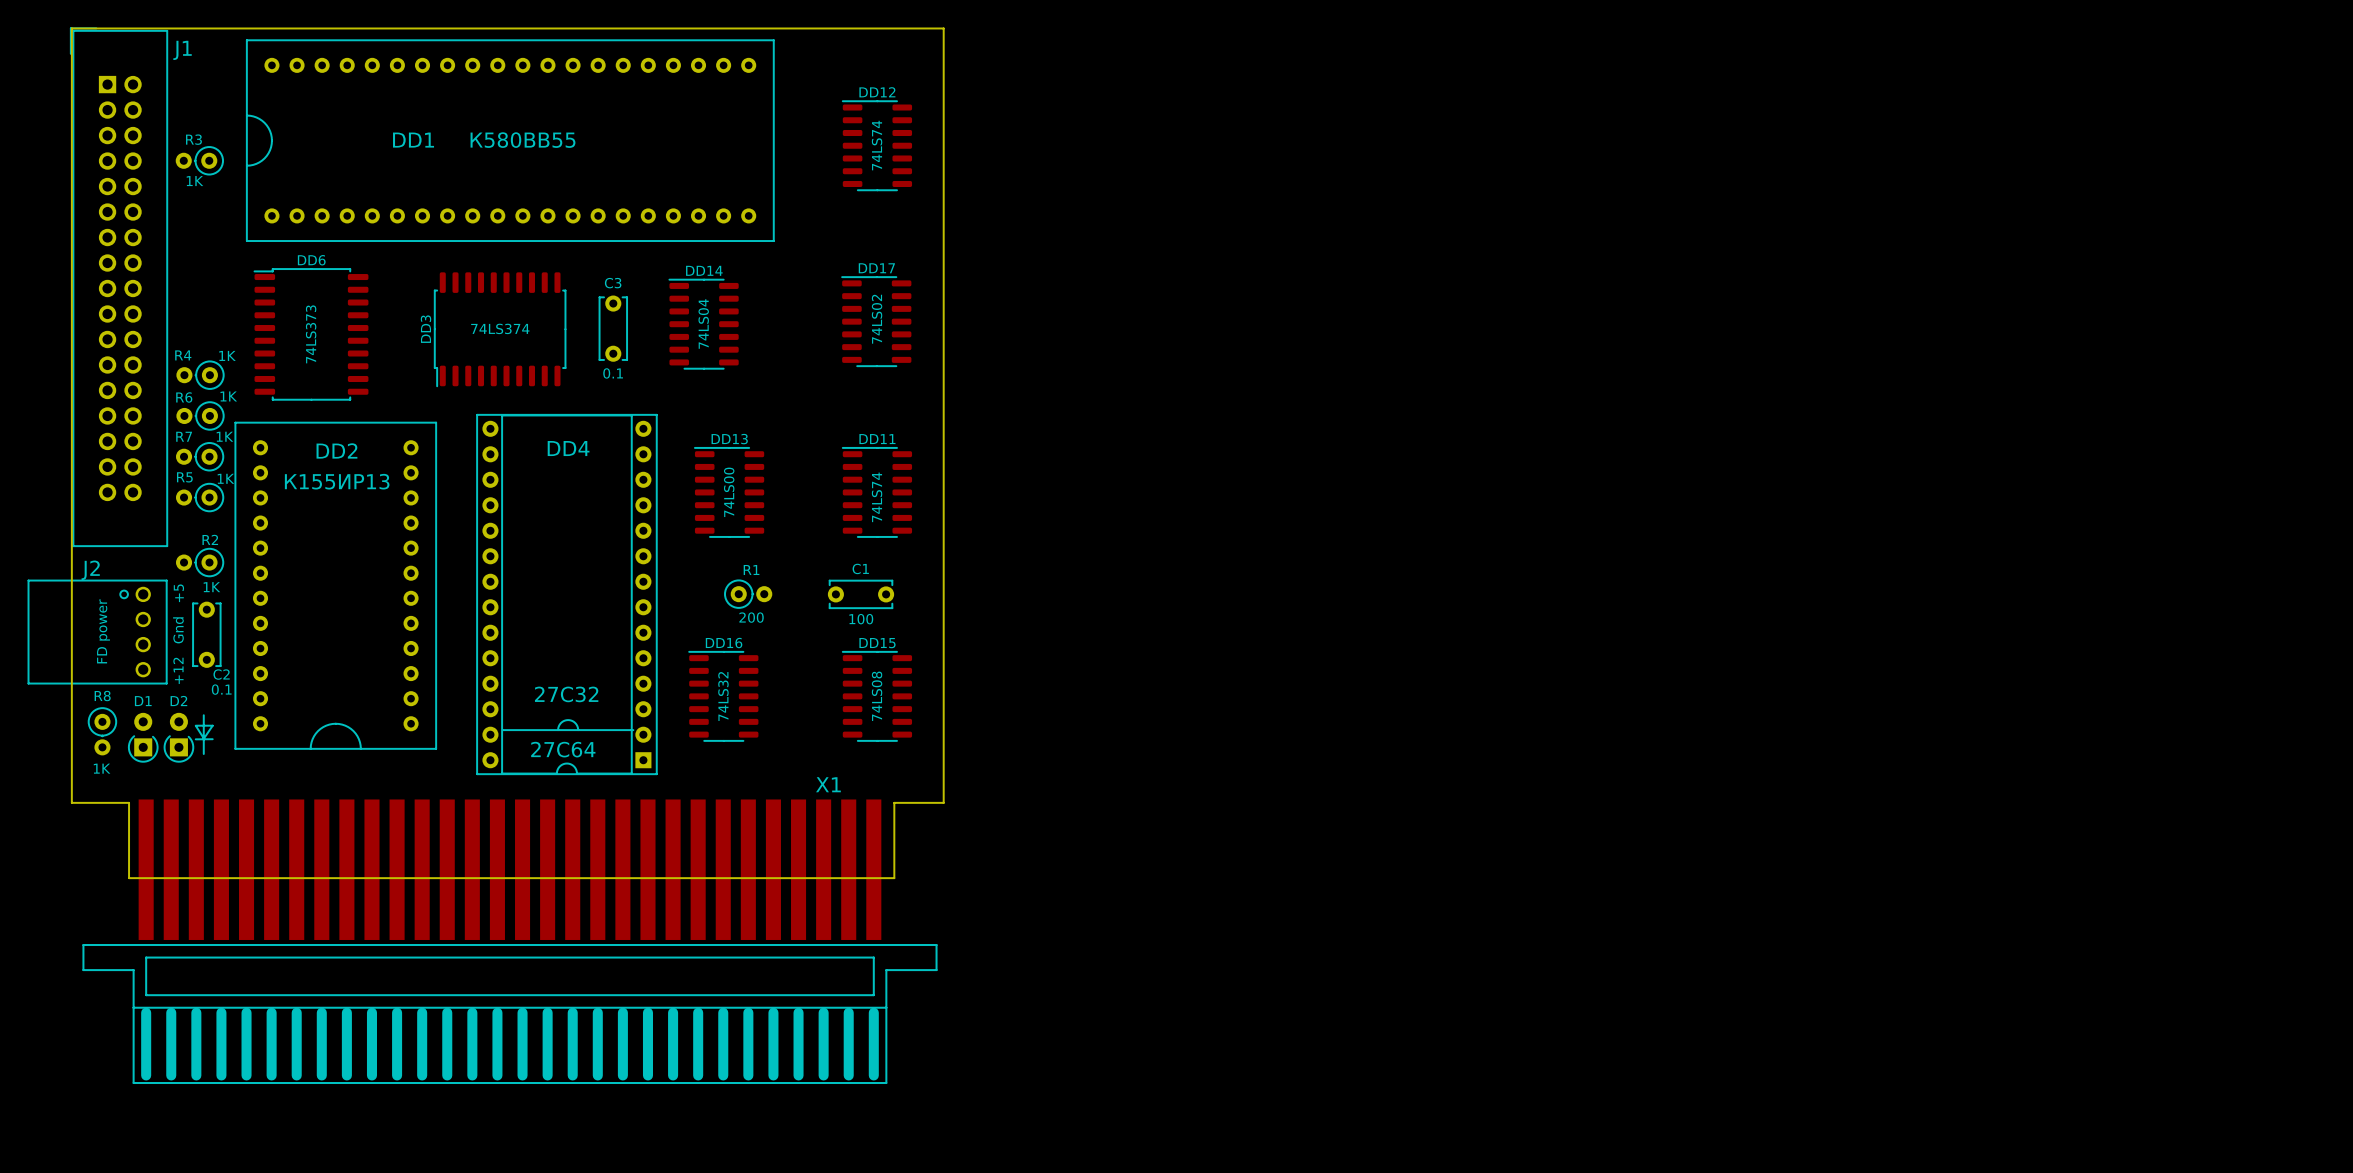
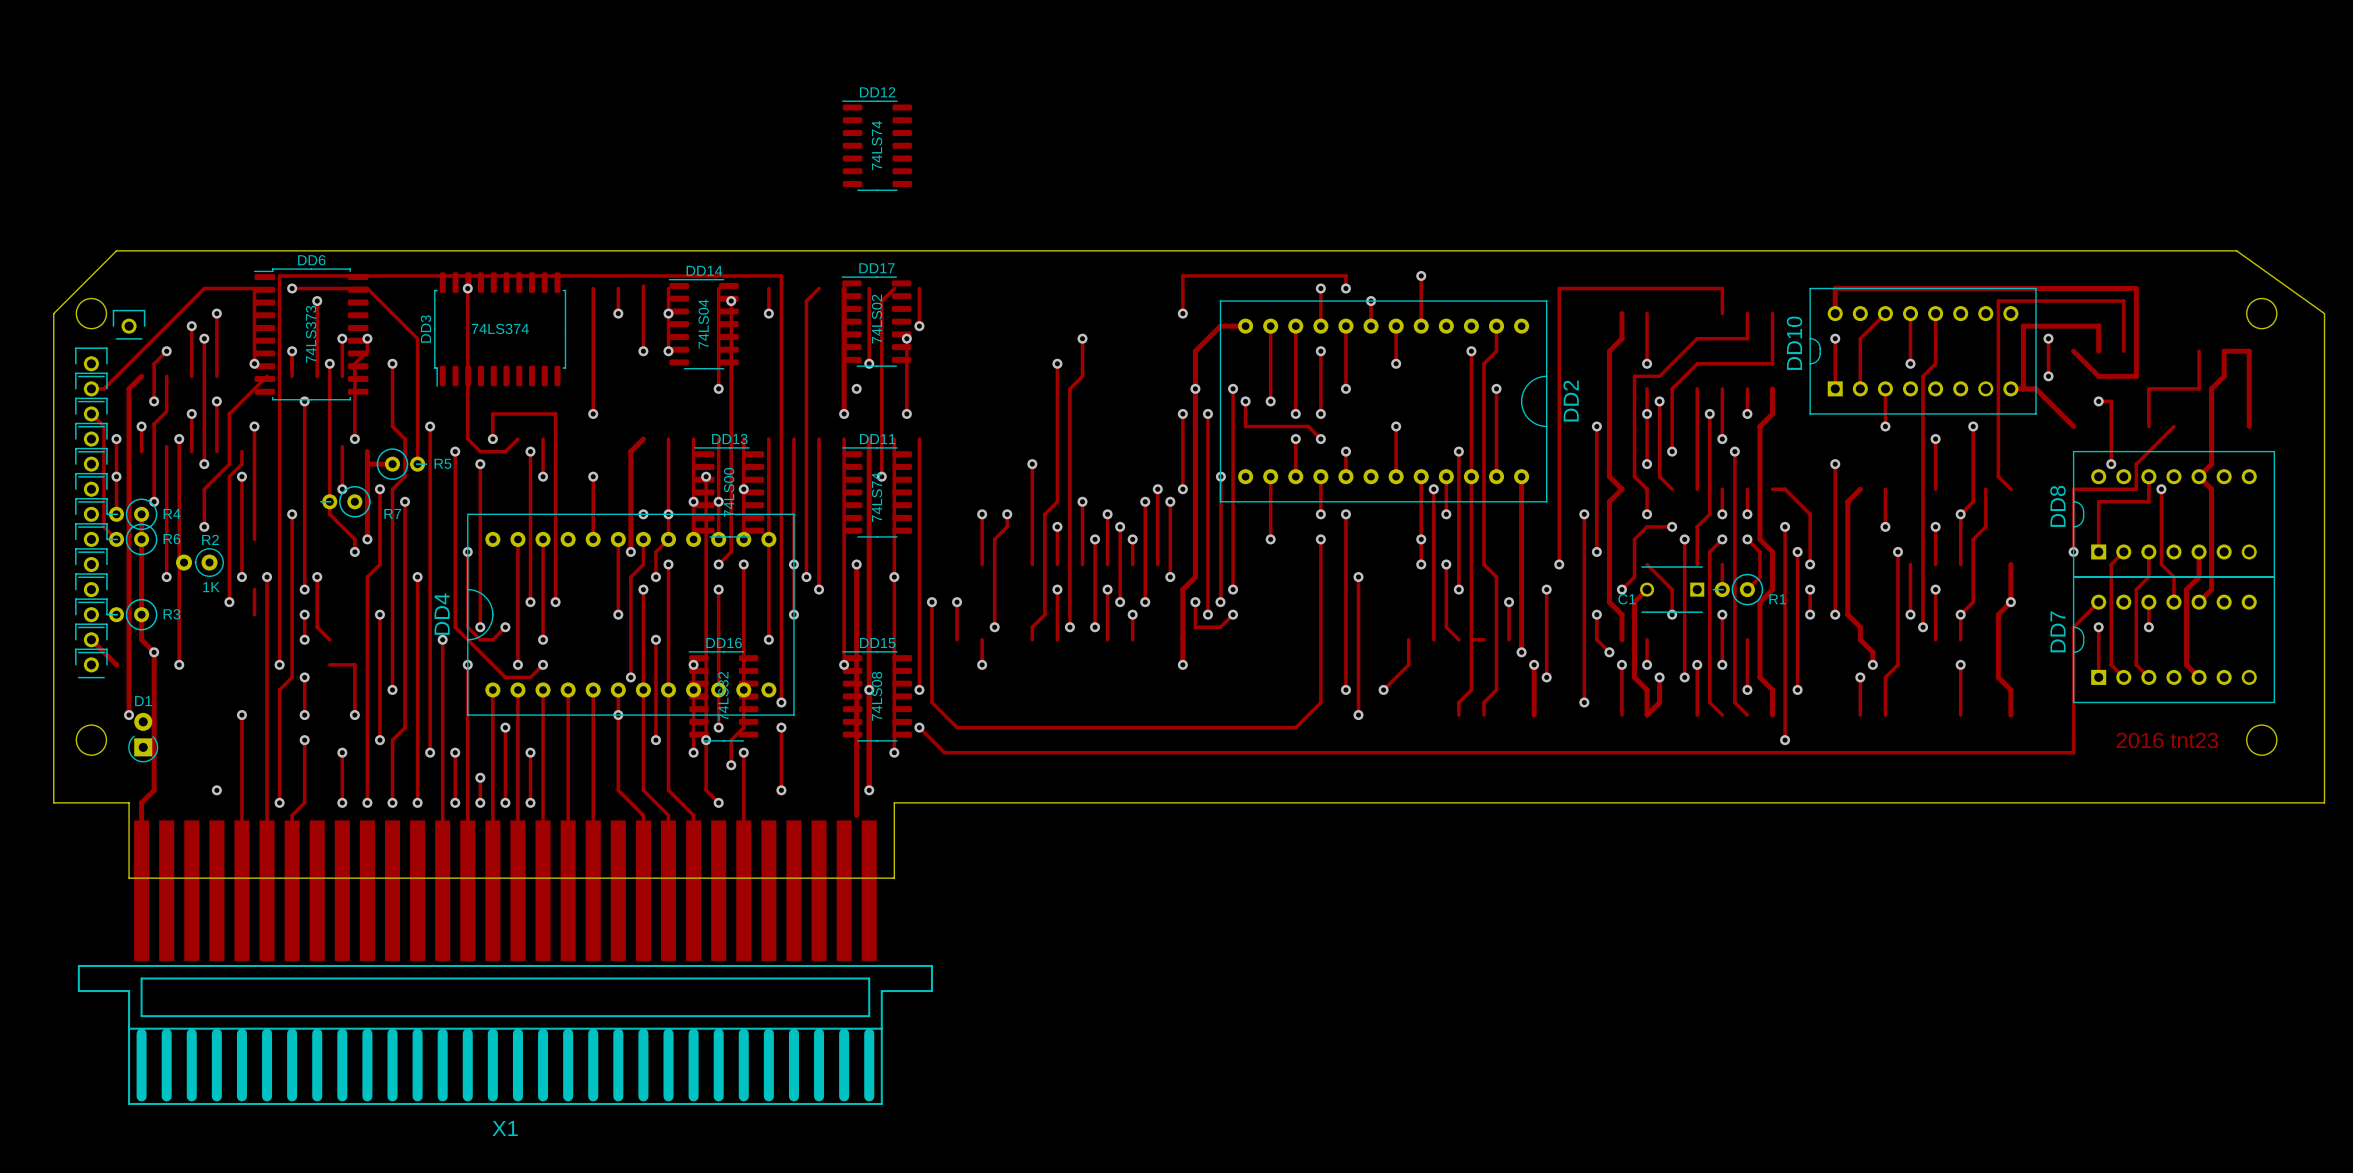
R3 name position: R3 (193, 139) -> R3 (171, 614)
DD1: К580ВВ55 (510, 140) -> none
R3 footprint: [175, 146, 224, 176] -> [106, 598, 158, 631]
R3 value: 1K (194, 181) -> none
track: none -> (1421, 275) (1421, 326)
via: none -> (1421, 275)
track: none -> (643, 285) (643, 351)
J1: (119, 287) -> none
track: none -> (292, 288) (367, 288) (417, 338) (417, 464)
via: none -> (292, 288)
track: none -> (467, 288) (467, 439) (480, 451) (505, 451) (517, 439)
via: none -> (467, 288)
track: none -> (593, 288) (593, 413)
track: none -> (618, 288) (618, 313)
track: none -> (668, 288) (668, 351)
track: none -> (718, 288) (718, 388)
track: none -> (768, 288) (768, 313)
track: none -> (819, 288) (806, 301) (806, 577)
track: none -> (844, 288) (844, 413)
track: none -> (869, 288) (869, 363)
track: none -> (894, 288) (881, 301) (881, 476)
track: none -> (919, 288) (919, 326)
track: none -> (1320, 288) (1320, 326)
via: none -> (1320, 288)
track: none -> (1345, 288) (1345, 275) (1182, 275) (1182, 313)
via: none -> (1345, 288)
round board edge: none -> [75, 298, 107, 330]
round board edge: none -> [2246, 298, 2278, 330]
track: none -> (317, 301) (317, 376)
via: none -> (317, 301)
track: none -> (731, 301) (731, 551) (718, 564)
via: none -> (731, 301)
track: none -> (1371, 301) (1371, 326)
via: none -> (1371, 301)
track: none -> (216, 313) (216, 376)
via: none -> (216, 313)
via: none -> (618, 313)
via: none -> (668, 313)
via: none -> (768, 313)
via: none -> (1182, 313)
track: none -> (1621, 313) (1621, 338) (1609, 351) (1609, 476) (1621, 489) (1609, 501) (1609, 602) (1621, 614) (1621, 639)
track: none -> (1647, 313) (1647, 363)
track: none -> (1722, 313) (1722, 288) (1559, 288) (1559, 564)
track: none -> (1747, 313) (1747, 338) (1697, 338) (1659, 376) (1634, 376) (1634, 476) (1647, 489) (1647, 514)
track: none -> (1772, 313) (1772, 363) (1697, 363) (1672, 388) (1672, 451)
track: none -> (1835, 313) (1835, 288) (2136, 288) (2136, 376) (2098, 376) (2073, 351)
track: none -> (1885, 313) (1860, 338) (1860, 388)
track: none -> (1910, 313) (1910, 363)
track: none -> (1935, 313) (1935, 363) (1923, 376) (1923, 627)
part: none -> (129, 324)
track: none -> (191, 326) (191, 376)
via: none -> (191, 326)
via: none -> (919, 326)
track: none -> (1245, 326) (1220, 326) (1195, 351) (1195, 577) (1182, 589) (1182, 664)
track: none -> (1270, 326) (1270, 401)
track: none -> (1295, 326) (1295, 413)
track: none -> (1345, 326) (1345, 388)
track: none -> (1396, 326) (1396, 363)
track: none -> (1496, 326) (1496, 351) (1483, 363) (1483, 564) (1496, 577) (1496, 689) (1483, 702) (1483, 715)
C3: 0.1 (613, 328) -> none
track: none -> (204, 338) (204, 464)
via: none -> (204, 338)
track: none -> (342, 338) (342, 376)
via: none -> (342, 338)
track: none -> (367, 338) (367, 351) (354, 363) (354, 439)
via: none -> (367, 338)
track: none -> (906, 338) (906, 413)
via: none -> (906, 338)
track: none -> (1082, 338) (1082, 376) (1069, 388) (1069, 627)
via: none -> (1082, 338)
track: none -> (1835, 338) (1835, 388)
via: none -> (1835, 338)
track: none -> (2048, 338) (2048, 376)
via: none -> (2048, 338)
track: none -> (166, 351) (154, 363) (154, 401)
via: none -> (166, 351)
track: none -> (292, 351) (292, 376)
via: none -> (292, 351)
via: none -> (643, 351)
via: none -> (668, 351)
track: none -> (1320, 351) (1320, 413)
via: none -> (1320, 351)
track: none -> (1471, 351) (1471, 689) (1458, 702) (1458, 715)
via: none -> (1471, 351)
DD10: none -> (1923, 351)
track: none -> (2098, 351) (2098, 326) (2023, 326) (2023, 388)
track: none -> (2123, 351) (2123, 301) (1998, 301) (1998, 476) (2010, 489)
track: none -> (2199, 351) (2199, 388) (2148, 388) (2148, 426)
R4 name position: R4 (183, 355) -> R4 (172, 513)
R4 value: 1K (227, 355) -> none
R4 footprint: [176, 360, 225, 390] -> [106, 498, 158, 531]
part: none -> (91, 362)
track: none -> (254, 363) (254, 288) (204, 288) (103, 388) (91, 388)
via: none -> (254, 363)
track: none -> (329, 363) (329, 514) (354, 539) (354, 551)
via: none -> (329, 363)
track: none -> (392, 363) (392, 426) (405, 439) (405, 476) (392, 489) (392, 689)
via: none -> (392, 363)
via: none -> (869, 363)
track: none -> (1057, 363) (1057, 501) (1044, 514) (1044, 614) (1032, 627) (1032, 639)
via: none -> (1057, 363)
via: none -> (1396, 363)
via: none -> (1647, 363)
via: none -> (1910, 363)
track: none -> (141, 376) (129, 388) (129, 715)
track: none -> (166, 376) (166, 411) (154, 423) (154, 501)
track: none -> (267, 376) (229, 413) (229, 464) (204, 489) (204, 526)
via: none -> (2048, 376)
part: none -> (91, 387)
via: none -> (718, 388)
via: none -> (856, 388)
via: none -> (1195, 388)
track: none -> (1233, 388) (1233, 589)
via: none -> (1233, 388)
via: none -> (1345, 388)
track: none -> (1496, 388) (1496, 476)
via: none -> (1496, 388)
track: none -> (1647, 388) (1647, 464)
track: none -> (1697, 388) (1697, 489)
track: none -> (1722, 388) (1722, 439)
track: none -> (1747, 388) (1747, 413)
track: none -> (1772, 388) (1772, 413) (1759, 426) (1759, 539) (1772, 551) (1772, 589) (1759, 602) (1759, 677) (1772, 689) (1772, 715)
track: none -> (1885, 388) (1885, 426)
track: none -> (2010, 388) (2035, 388) (2073, 426)
R6 value: 1K (228, 396) -> none
R6 name position: R6 (184, 397) -> R6 (171, 539)
via: none -> (154, 401)
R6 footprint: [176, 401, 225, 431] -> [106, 523, 158, 556]
track: none -> (216, 401) (216, 451)
via: none -> (216, 401)
track: none -> (304, 401) (304, 589)
via: none -> (304, 401)
track: none -> (1245, 401) (1245, 426) (1308, 426) (1320, 439)
via: none -> (1245, 401)
via: none -> (1270, 401)
track: none -> (1659, 401) (1659, 476) (1672, 489)
via: none -> (1659, 401)
track: none -> (2098, 401) (2111, 401) (2111, 464)
via: none -> (2098, 401)
part: none -> (91, 412)
track: none -> (91, 413) (103, 426) (103, 526) (116, 539)
track: none -> (191, 413) (191, 451)
via: none -> (191, 413)
via: none -> (593, 413)
via: none -> (844, 413)
via: none -> (906, 413)
track: none -> (1182, 413) (1182, 489)
via: none -> (1182, 413)
track: none -> (1207, 413) (1207, 614)
via: none -> (1207, 413)
via: none -> (1295, 413)
via: none -> (1320, 413)
via: none -> (1647, 413)
track: none -> (1709, 413) (1709, 514) (1697, 526) (1697, 564)
via: none -> (1709, 413)
via: none -> (1747, 413)
DD4 footprint: [476, 414, 658, 775] -> [467, 514, 795, 716]
track: none -> (141, 426) (141, 451)
via: none -> (141, 426)
track: none -> (254, 426) (254, 539)
via: none -> (254, 426)
track: none -> (430, 426) (430, 752)
via: none -> (430, 426)
track: none -> (1396, 426) (1396, 476)
via: none -> (1396, 426)
track: none -> (1596, 426) (1596, 551)
via: none -> (1596, 426)
via: none -> (1885, 426)
track: none -> (1973, 426) (1973, 501) (1960, 514) (1960, 564)
via: none -> (1973, 426)
track: none -> (2173, 426) (2136, 464) (2136, 489) (2073, 489) (2073, 551)
track: none -> (2249, 426) (2249, 351) (2224, 351) (2224, 376) (2211, 388) (2211, 464) (2199, 476) (2211, 489) (2211, 589) (2199, 602)
R7 name position: R7 (184, 436) -> R7 (392, 513)
R7 value: 1K (224, 436) -> none
part: none -> (91, 437)
track: none -> (116, 439) (116, 514)
via: none -> (116, 439)
track: none -> (179, 439) (179, 664)
via: none -> (179, 439)
via: none -> (354, 439)
track: none -> (492, 439) (492, 413) (555, 413) (555, 602)
via: none -> (492, 439)
track: none -> (543, 439) (543, 476)
track: none -> (643, 439) (630, 451) (630, 551)
track: none -> (668, 439) (668, 539) (655, 551) (655, 577)
track: none -> (693, 439) (693, 539)
track: none -> (718, 439) (718, 539)
track: none -> (743, 439) (743, 539)
track: none -> (768, 439) (768, 639)
track: none -> (793, 439) (793, 614)
track: none -> (819, 439) (819, 589)
track: none -> (844, 439) (844, 664)
track: none -> (869, 439) (869, 790)
track: none -> (894, 439) (894, 752)
track: none -> (919, 439) (919, 689)
track: none -> (1295, 439) (1295, 476)
via: none -> (1295, 439)
via: none -> (1320, 439)
via: none -> (1722, 439)
track: none -> (1935, 439) (1935, 489)
via: none -> (1935, 439)
R7 footprint: [175, 442, 224, 472] -> [319, 485, 371, 518]
track: none -> (166, 446) (166, 577)
track: none -> (342, 446) (342, 489)
DD4 name position: DD4 (568, 448) -> DD4 (442, 614)
DD2 name position: DD2 (336, 450) -> DD2 (1571, 401)
track: none -> (241, 451) (241, 464) (229, 476) (229, 602)
track: none -> (367, 451) (367, 539)
track: none -> (455, 451) (455, 627) (505, 677) (530, 677) (543, 664)
via: none -> (455, 451)
track: none -> (530, 451) (530, 602)
via: none -> (530, 451)
track: none -> (1345, 451) (1345, 476)
via: none -> (1345, 451)
track: none -> (1458, 451) (1458, 589)
via: none -> (1458, 451)
via: none -> (1672, 451)
track: none -> (1734, 451) (1734, 702) (1747, 715)
via: none -> (1734, 451)
part: none -> (91, 462)
via: none -> (204, 464)
track: none -> (367, 464) (392, 464)
track: none -> (480, 464) (480, 627)
via: none -> (480, 464)
track: none -> (1032, 464) (1032, 564)
via: none -> (1032, 464)
via: none -> (1647, 464)
track: none -> (1835, 464) (1835, 614)
via: none -> (1835, 464)
via: none -> (2111, 464)
via: none -> (116, 476)
track: none -> (241, 476) (241, 577)
via: none -> (241, 476)
via: none -> (543, 476)
track: none -> (593, 476) (593, 539)
via: none -> (593, 476)
track: none -> (706, 476) (706, 790) (718, 802)
via: none -> (706, 476)
via: none -> (881, 476)
track: none -> (1220, 476) (1220, 602)
via: none -> (1220, 476)
track: none -> (1270, 476) (1270, 539)
track: none -> (1320, 476) (1320, 514)
track: none -> (1421, 476) (1421, 564)
track: none -> (1446, 476) (1446, 514)
track: none -> (1521, 476) (1521, 652)
track: none -> (2148, 476) (2148, 501) (2098, 501) (2098, 551)
R5 name position: R5 (184, 477) -> R5 (442, 463)
R5 value: 1K (225, 478) -> none
DD2 value: К155ИР13 (337, 481) -> none
R5 footprint: [175, 483, 224, 512] -> [376, 448, 428, 480]
part: none -> (91, 487)
via: none -> (342, 489)
track: none -> (379, 489) (379, 564) (367, 577) (367, 802)
via: none -> (379, 489)
via: none -> (743, 489)
track: none -> (1157, 489) (1157, 564)
via: none -> (1157, 489)
via: none -> (1182, 489)
track: none -> (1433, 489) (1433, 639)
via: none -> (1433, 489)
track: none -> (1722, 489) (1722, 514)
track: none -> (1747, 489) (1747, 514)
track: none -> (1772, 489) (1785, 489) (1810, 514) (1810, 564)
track: none -> (1860, 489) (1847, 501) (1847, 614) (1860, 627) (1860, 639) (1872, 652) (1872, 664)
track: none -> (1885, 489) (1885, 526)
track: none -> (1985, 489) (1985, 526) (1973, 539) (1973, 602) (1960, 614) (1960, 639)
track: none -> (2161, 489) (2161, 564) (2173, 577) (2173, 602)
via: none -> (2161, 489)
via: none -> (154, 501)
track: none -> (405, 501) (405, 727) (392, 740) (392, 802)
via: none -> (405, 501)
via: none -> (693, 501)
via: none -> (718, 501)
track: none -> (1082, 501) (1082, 564)
via: none -> (1082, 501)
track: none -> (1145, 501) (1145, 602)
via: none -> (1145, 501)
track: none -> (1170, 501) (1170, 577)
via: none -> (1170, 501)
part: none -> (91, 512)
track: none -> (141, 514) (141, 639) (154, 652) (154, 790) (141, 802) (141, 890)
track: none -> (292, 514) (292, 677) (279, 689) (279, 802)
via: none -> (292, 514)
via: none -> (643, 514)
via: none -> (668, 514)
track: none -> (982, 514) (982, 564)
via: none -> (982, 514)
track: none -> (1007, 514) (1007, 526) (994, 539) (994, 627)
via: none -> (1007, 514)
track: none -> (1107, 514) (1107, 564)
via: none -> (1107, 514)
via: none -> (1320, 514)
track: none -> (1345, 514) (1345, 689)
via: none -> (1345, 514)
via: none -> (1446, 514)
track: none -> (1584, 514) (1584, 702)
via: none -> (1584, 514)
via: none -> (1647, 514)
via: none -> (1722, 514)
via: none -> (1747, 514)
via: none -> (1960, 514)
DD8: none -> (2173, 514)
via: none -> (204, 526)
track: none -> (1057, 526) (1057, 564)
via: none -> (1057, 526)
track: none -> (1120, 526) (1120, 602)
via: none -> (1120, 526)
track: none -> (1672, 526) (1647, 526) (1634, 539) (1634, 577) (1621, 589)
via: none -> (1672, 526)
track: none -> (1785, 526) (1785, 740)
via: none -> (1785, 526)
via: none -> (1885, 526)
track: none -> (1935, 526) (1935, 564)
via: none -> (1935, 526)
part: none -> (91, 538)
via: none -> (367, 539)
track: none -> (517, 539) (517, 664)
track: none -> (543, 539) (543, 639)
track: none -> (618, 539) (618, 614)
track: none -> (643, 539) (643, 564) (630, 577) (630, 677)
track: none -> (1095, 539) (1095, 627)
via: none -> (1095, 539)
track: none -> (1132, 539) (1132, 564)
via: none -> (1132, 539)
via: none -> (1270, 539)
track: none -> (1320, 539) (1320, 702) (1295, 727) (957, 727) (931, 702) (931, 602)
via: none -> (1320, 539)
via: none -> (1421, 539)
track: none -> (1684, 539) (1684, 677)
via: none -> (1684, 539)
track: none -> (1722, 539) (1709, 551) (1709, 702) (1722, 715)
via: none -> (1722, 539)
track: none -> (1747, 539) (1759, 551) (1759, 577) (1747, 589)
via: none -> (1747, 539)
via: none -> (354, 551)
track: none -> (467, 551) (467, 627) (480, 639) (492, 639) (505, 627)
via: none -> (467, 551)
via: none -> (630, 551)
via: none -> (1596, 551)
track: none -> (1797, 551) (1797, 689)
via: none -> (1797, 551)
track: none -> (1897, 551) (1897, 664) (1885, 677) (1885, 715)
via: none -> (1897, 551)
via: none -> (2073, 551)
track: none -> (2123, 551) (2111, 564) (2111, 664) (2123, 677)
track: none -> (2148, 551) (2148, 577) (2136, 589) (2136, 664) (2148, 677)
track: none -> (2199, 551) (2199, 577) (2186, 589) (2186, 664) (2199, 677)
part: none -> (91, 563)
track: none -> (668, 564) (668, 790) (693, 815) (693, 890)
via: none -> (668, 564)
via: none -> (718, 564)
track: none -> (743, 564) (743, 727) (731, 740) (731, 765)
via: none -> (743, 564)
via: none -> (793, 564)
track: none -> (856, 564) (856, 815)
via: none -> (856, 564)
via: none -> (1421, 564)
track: none -> (1446, 564) (1446, 627) (1458, 639)
via: none -> (1446, 564)
via: none -> (1559, 564)
track: none -> (1647, 564) (1672, 589) (1672, 614)
track: none -> (1722, 564) (1722, 589)
via: none -> (1810, 564)
track: none -> (1910, 564) (1910, 614)
track: none -> (2010, 564) (2010, 602) (1998, 614) (1998, 677) (2010, 689) (2010, 715)
C1 name position: C1 (860, 568) -> C1 (1627, 599)
R1 name position: R1 (751, 570) -> R1 (1777, 599)
via: none -> (166, 577)
via: none -> (241, 577)
track: none -> (267, 577) (267, 890)
via: none -> (267, 577)
track: none -> (317, 577) (317, 627) (329, 639)
via: none -> (317, 577)
track: none -> (417, 577) (417, 802)
via: none -> (417, 577)
via: none -> (655, 577)
via: none -> (806, 577)
via: none -> (894, 577)
via: none -> (1170, 577)
track: none -> (1358, 577) (1358, 715)
via: none -> (1358, 577)
R1 footprint: [724, 579, 773, 609] -> [1712, 573, 1764, 606]
C1 footprint: [827, 580, 895, 609] -> [1640, 566, 1705, 613]
DD2 rotation: 0° (335, 585) -> 90° counterclockwise (1383, 401)
DD2 position: (335, 585) -> (1383, 401)
part: none -> (91, 588)
track: none -> (254, 589) (254, 614)
via: none -> (304, 589)
track: none -> (643, 589) (643, 790) (668, 815) (668, 890)
via: none -> (643, 589)
track: none -> (718, 589) (718, 727)
via: none -> (718, 589)
via: none -> (819, 589)
track: none -> (1057, 589) (1057, 639)
via: none -> (1057, 589)
track: none -> (1107, 589) (1107, 639)
via: none -> (1107, 589)
via: none -> (1233, 589)
via: none -> (1458, 589)
track: none -> (1546, 589) (1546, 677)
via: none -> (1546, 589)
via: none -> (1621, 589)
track: none -> (1647, 589) (1634, 602) (1634, 677) (1647, 689) (1647, 715) (1659, 702) (1659, 677)
track: none -> (1810, 589) (1810, 614)
via: none -> (1810, 589)
track: none -> (1935, 589) (1935, 639)
via: none -> (1935, 589)
text: +5 (178, 593) -> none
via: none -> (229, 602)
via: none -> (530, 602)
via: none -> (555, 602)
via: none -> (931, 602)
track: none -> (957, 602) (957, 639)
via: none -> (957, 602)
via: none -> (1120, 602)
via: none -> (1145, 602)
track: none -> (1195, 602) (1195, 627) (1220, 627) (1233, 614)
via: none -> (1195, 602)
via: none -> (1220, 602)
track: none -> (1509, 602) (1509, 639)
via: none -> (1509, 602)
via: none -> (2010, 602)
track: none -> (2098, 602) (2073, 627) (2073, 752) (944, 752) (919, 727)
track: none -> (2148, 602) (2148, 627)
part: none -> (91, 613)
track: none -> (304, 614) (304, 639)
via: none -> (304, 614)
track: none -> (379, 614) (379, 740)
via: none -> (379, 614)
via: none -> (618, 614)
via: none -> (793, 614)
track: none -> (1132, 614) (1132, 639)
via: none -> (1132, 614)
via: none -> (1207, 614)
via: none -> (1233, 614)
track: none -> (1596, 614) (1596, 639) (1609, 652)
via: none -> (1596, 614)
via: none -> (1672, 614)
track: none -> (1722, 614) (1722, 664)
via: none -> (1722, 614)
via: none -> (1810, 614)
via: none -> (1835, 614)
via: none -> (1910, 614)
via: none -> (1960, 614)
R1 value: 200 (751, 617) -> none
C1 value: 100 (861, 619) -> none
via: none -> (480, 627)
via: none -> (505, 627)
via: none -> (994, 627)
via: none -> (1069, 627)
via: none -> (1095, 627)
via: none -> (1923, 627)
track: none -> (2098, 627) (2098, 677)
via: none -> (2098, 627)
via: none -> (2148, 627)
text: Gnd (178, 630) -> none
J2: FD power (97, 632) -> none
C2: 0.1 (206, 634) -> none
part: none -> (91, 638)
track: none -> (91, 639) (116, 664)
via: none -> (304, 639)
track: none -> (442, 639) (442, 878)
via: none -> (442, 639)
via: none -> (543, 639)
track: none -> (655, 639) (655, 740)
via: none -> (655, 639)
via: none -> (768, 639)
track: none -> (982, 639) (982, 664)
track: none -> (1408, 639) (1408, 664) (1383, 689)
track: none -> (1471, 639) (1483, 639)
track: none -> (1647, 639) (1647, 664)
track: none -> (1747, 639) (1747, 689)
DD7: none -> (2173, 639)
via: none -> (154, 652)
via: none -> (1521, 652)
via: none -> (1609, 652)
part: none -> (91, 663)
via: none -> (179, 664)
track: none -> (279, 664) (279, 275) (781, 275) (781, 702)
via: none -> (279, 664)
track: none -> (329, 664) (354, 664) (354, 715)
track: none -> (467, 664) (467, 878)
via: none -> (467, 664)
via: none -> (517, 664)
via: none -> (543, 664)
track: none -> (693, 664) (693, 752)
via: none -> (693, 664)
via: none -> (844, 664)
via: none -> (982, 664)
via: none -> (1182, 664)
track: none -> (1534, 664) (1534, 715)
via: none -> (1534, 664)
track: none -> (1621, 664) (1621, 715)
via: none -> (1621, 664)
via: none -> (1647, 664)
track: none -> (1697, 664) (1697, 715)
via: none -> (1697, 664)
via: none -> (1722, 664)
via: none -> (1872, 664)
track: none -> (1960, 664) (1960, 715)
via: none -> (1960, 664)
text: +12 (178, 670) -> none
track: none -> (304, 677) (304, 715)
via: none -> (304, 677)
via: none -> (630, 677)
via: none -> (1546, 677)
via: none -> (1659, 677)
via: none -> (1684, 677)
track: none -> (1860, 677) (1860, 715)
via: none -> (1860, 677)
via: none -> (392, 689)
track: none -> (492, 689) (492, 878)
track: none -> (517, 689) (517, 878)
track: none -> (543, 689) (543, 878)
track: none -> (568, 689) (568, 878)
track: none -> (593, 689) (593, 878)
track: none -> (618, 689) (618, 790) (643, 815) (643, 890)
via: none -> (869, 689)
via: none -> (919, 689)
via: none -> (1345, 689)
via: none -> (1383, 689)
via: none -> (1747, 689)
via: none -> (1797, 689)
via: none -> (781, 702)
via: none -> (1584, 702)
via: none -> (129, 715)
line: (203, 715) (203, 753) -> none
track: none -> (241, 715) (241, 878)
via: none -> (241, 715)
via: none -> (304, 715)
via: none -> (354, 715)
via: none -> (618, 715)
via: none -> (1358, 715)
round board edge: none -> [75, 724, 107, 756]
round board edge: none -> [2246, 724, 2278, 756]
line: (195, 725) (203, 738) (212, 725) (196, 725) -> none
track: none -> (505, 727) (505, 802)
via: none -> (505, 727)
via: none -> (718, 727)
track: none -> (781, 727) (781, 790)
via: none -> (781, 727)
via: none -> (919, 727)
line: (502, 730) (633, 730) -> none
line: (558, 730) (561, 723) (568, 720) (575, 723) (578, 730) -> none
R8: 1K (102, 731) -> none
D2: (178, 737) -> none
line: (212, 739) (195, 739) -> none
track: none -> (304, 740) (304, 802) (292, 815) (292, 890)
via: none -> (304, 740)
via: none -> (379, 740)
via: none -> (655, 740)
via: none -> (706, 740)
via: none -> (1785, 740)
text: none -> 2016 tnt23 (2167, 740)
DD4 value: 27C64 (563, 749) -> none
track: none -> (342, 752) (342, 802)
via: none -> (342, 752)
via: none -> (430, 752)
track: none -> (455, 752) (455, 802)
via: none -> (455, 752)
track: none -> (530, 752) (530, 802)
via: none -> (530, 752)
via: none -> (693, 752)
track: none -> (743, 752) (743, 878)
via: none -> (743, 752)
via: none -> (894, 752)
via: none -> (731, 765)
track: none -> (480, 777) (480, 802)
via: none -> (480, 777)
X1 name position: X1 (828, 784) -> X1 (505, 1128)
via: none -> (216, 790)
via: none -> (781, 790)
via: none -> (869, 790)
board edge: (71, 802) (71, 28) (943, 28) (943, 802) -> (71, 802) (53, 802) (53, 313) (116, 250) (2236, 250) (2324, 313) (2324, 802) (943, 802)
via: none -> (279, 802)
via: none -> (342, 802)
via: none -> (367, 802)
via: none -> (392, 802)
via: none -> (417, 802)
via: none -> (455, 802)
via: none -> (480, 802)
via: none -> (505, 802)
via: none -> (530, 802)
via: none -> (718, 802)
X1 position: (509, 941) -> (505, 962)

